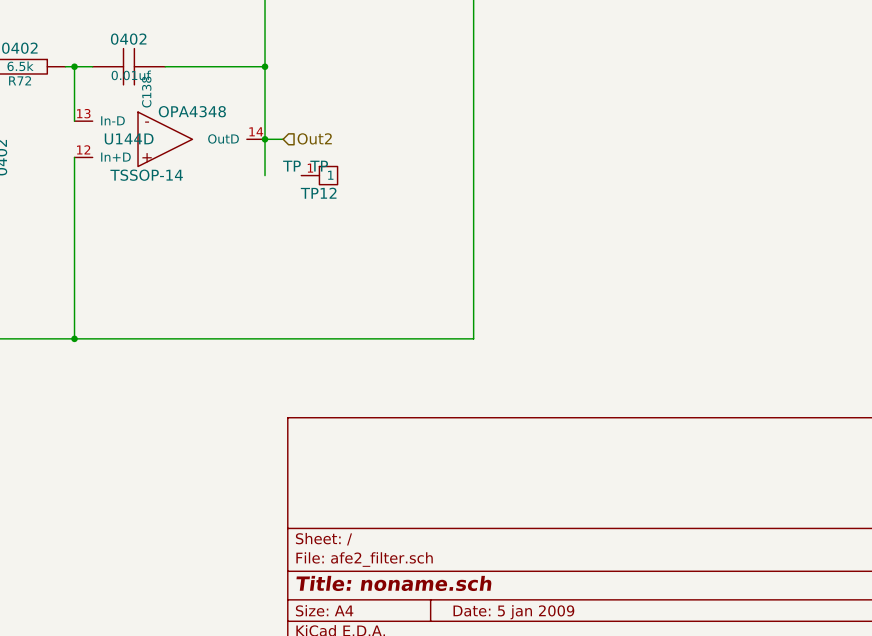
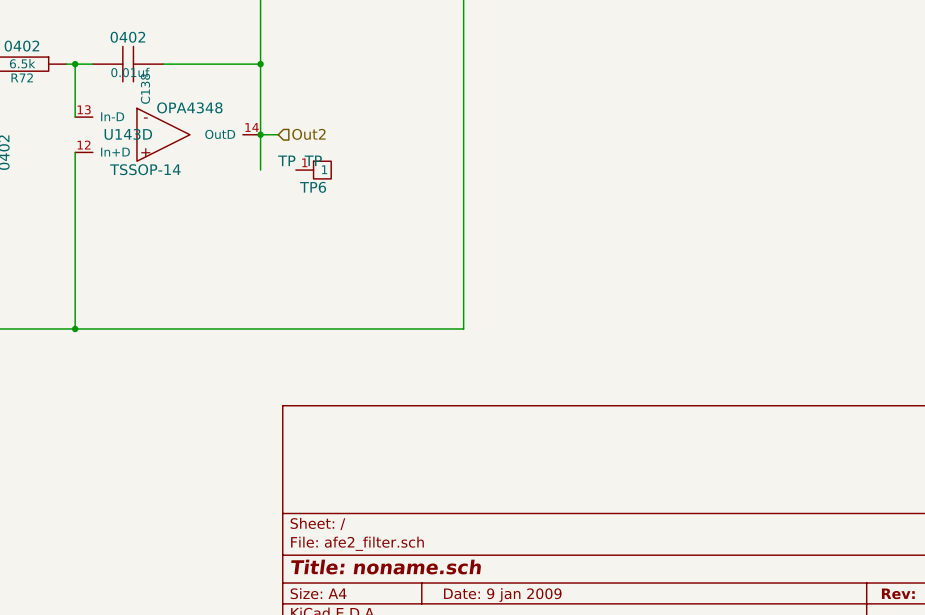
U144D name: U144D (129, 139) -> U143D (128, 134)
TP12 name: TP12 (318, 193) -> TP6 (313, 187)
title block: Date: 5 jan 2009 (513, 612) -> Date: 9 jan 2009 (502, 595)

